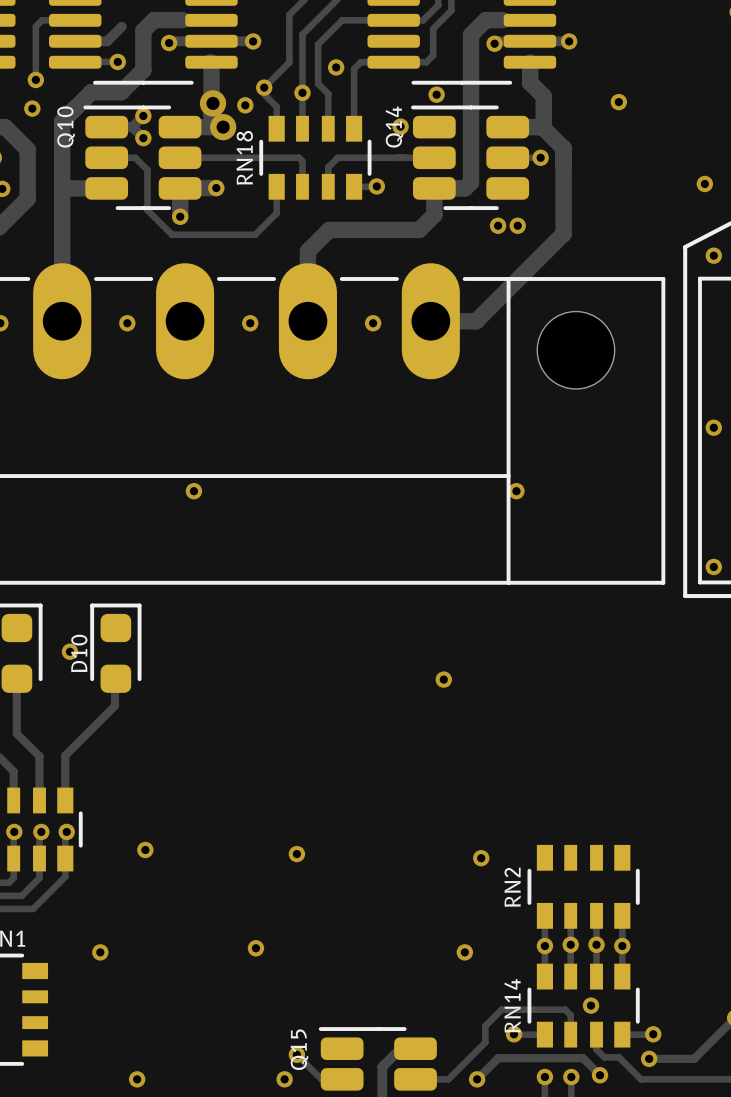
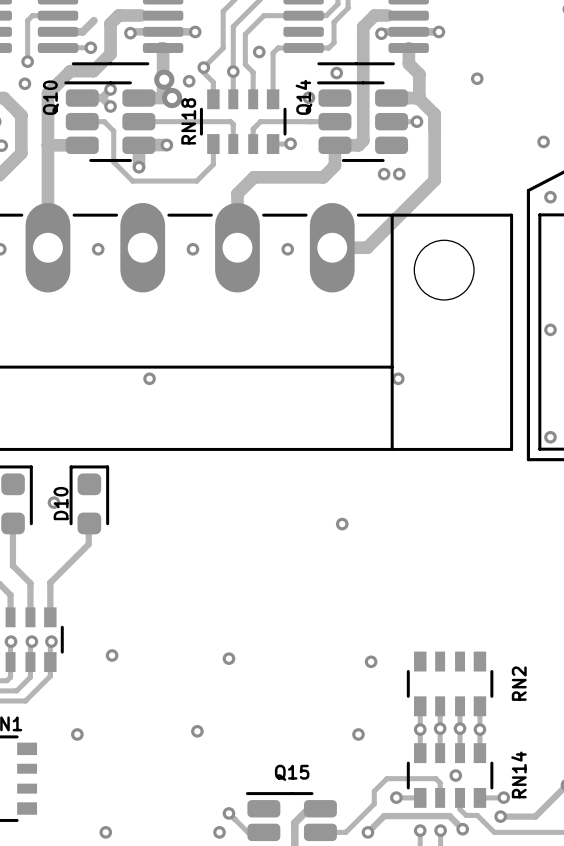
RN2 name position: RN2 (512, 887) -> RN2 (519, 683)
RN14 name position: RN14 (512, 1005) -> RN14 (518, 774)
Q15 name rotation: 0° (299, 1049) -> 90° clockwise (292, 772)
Q15 name position: Q15 (299, 1049) -> Q15 (292, 772)

